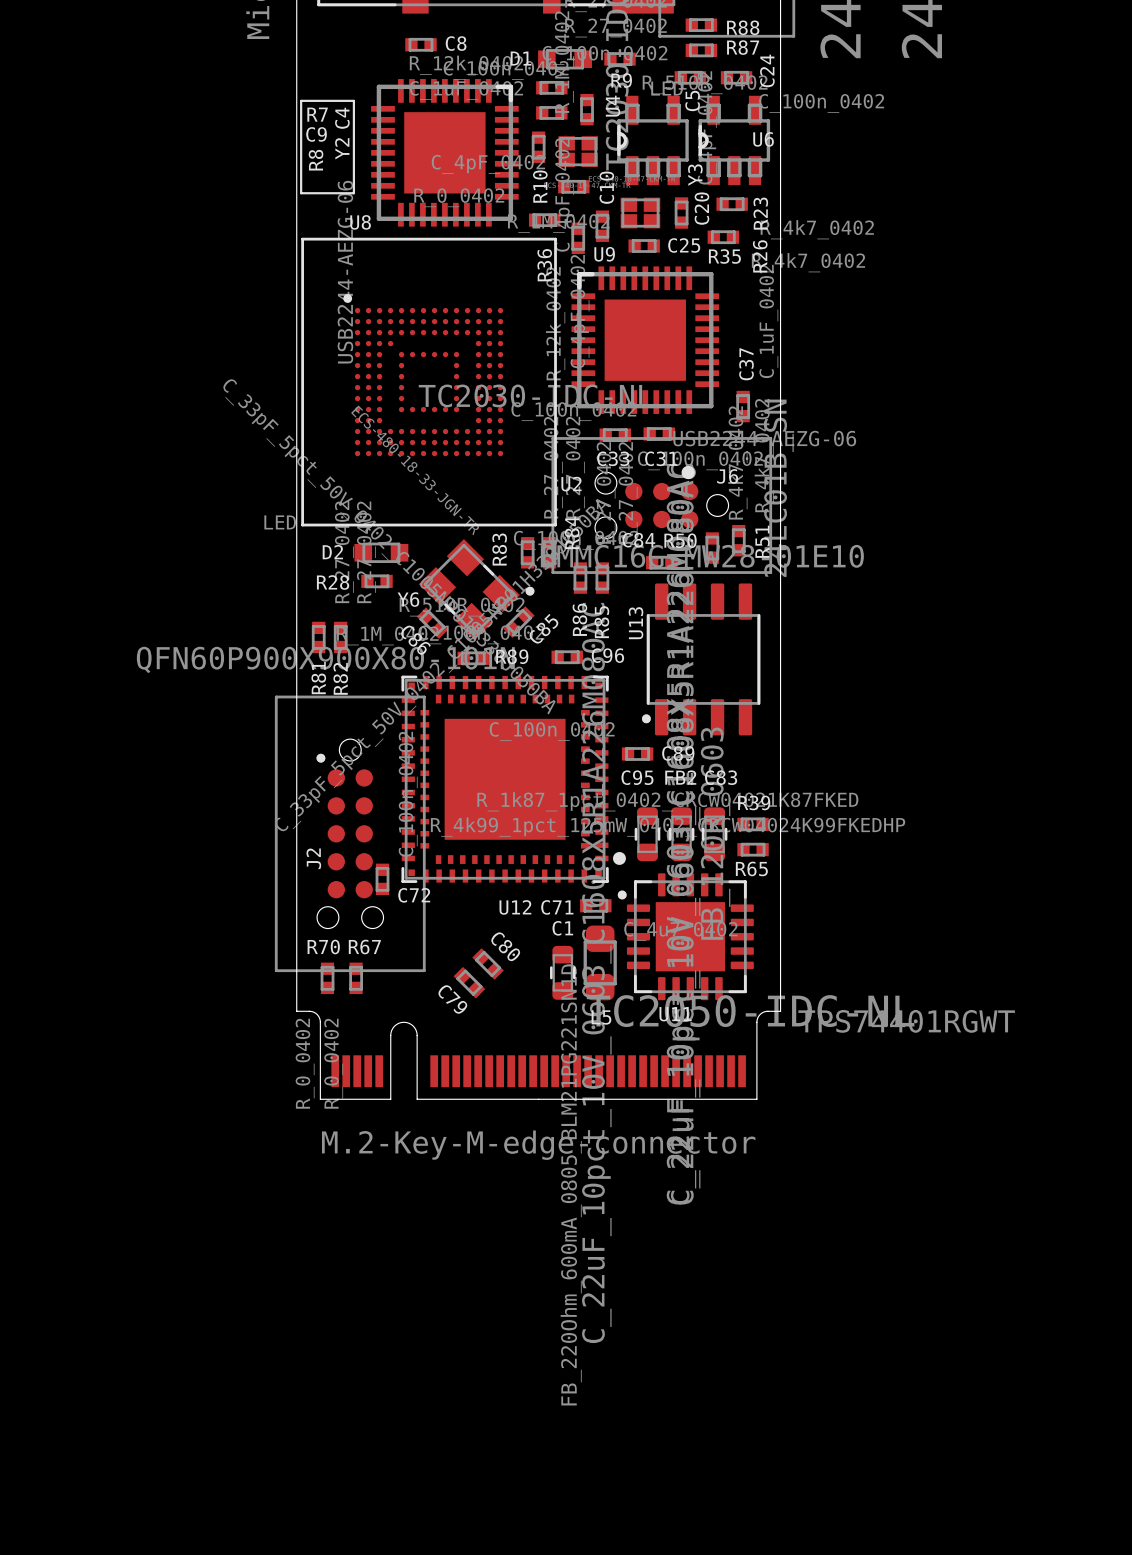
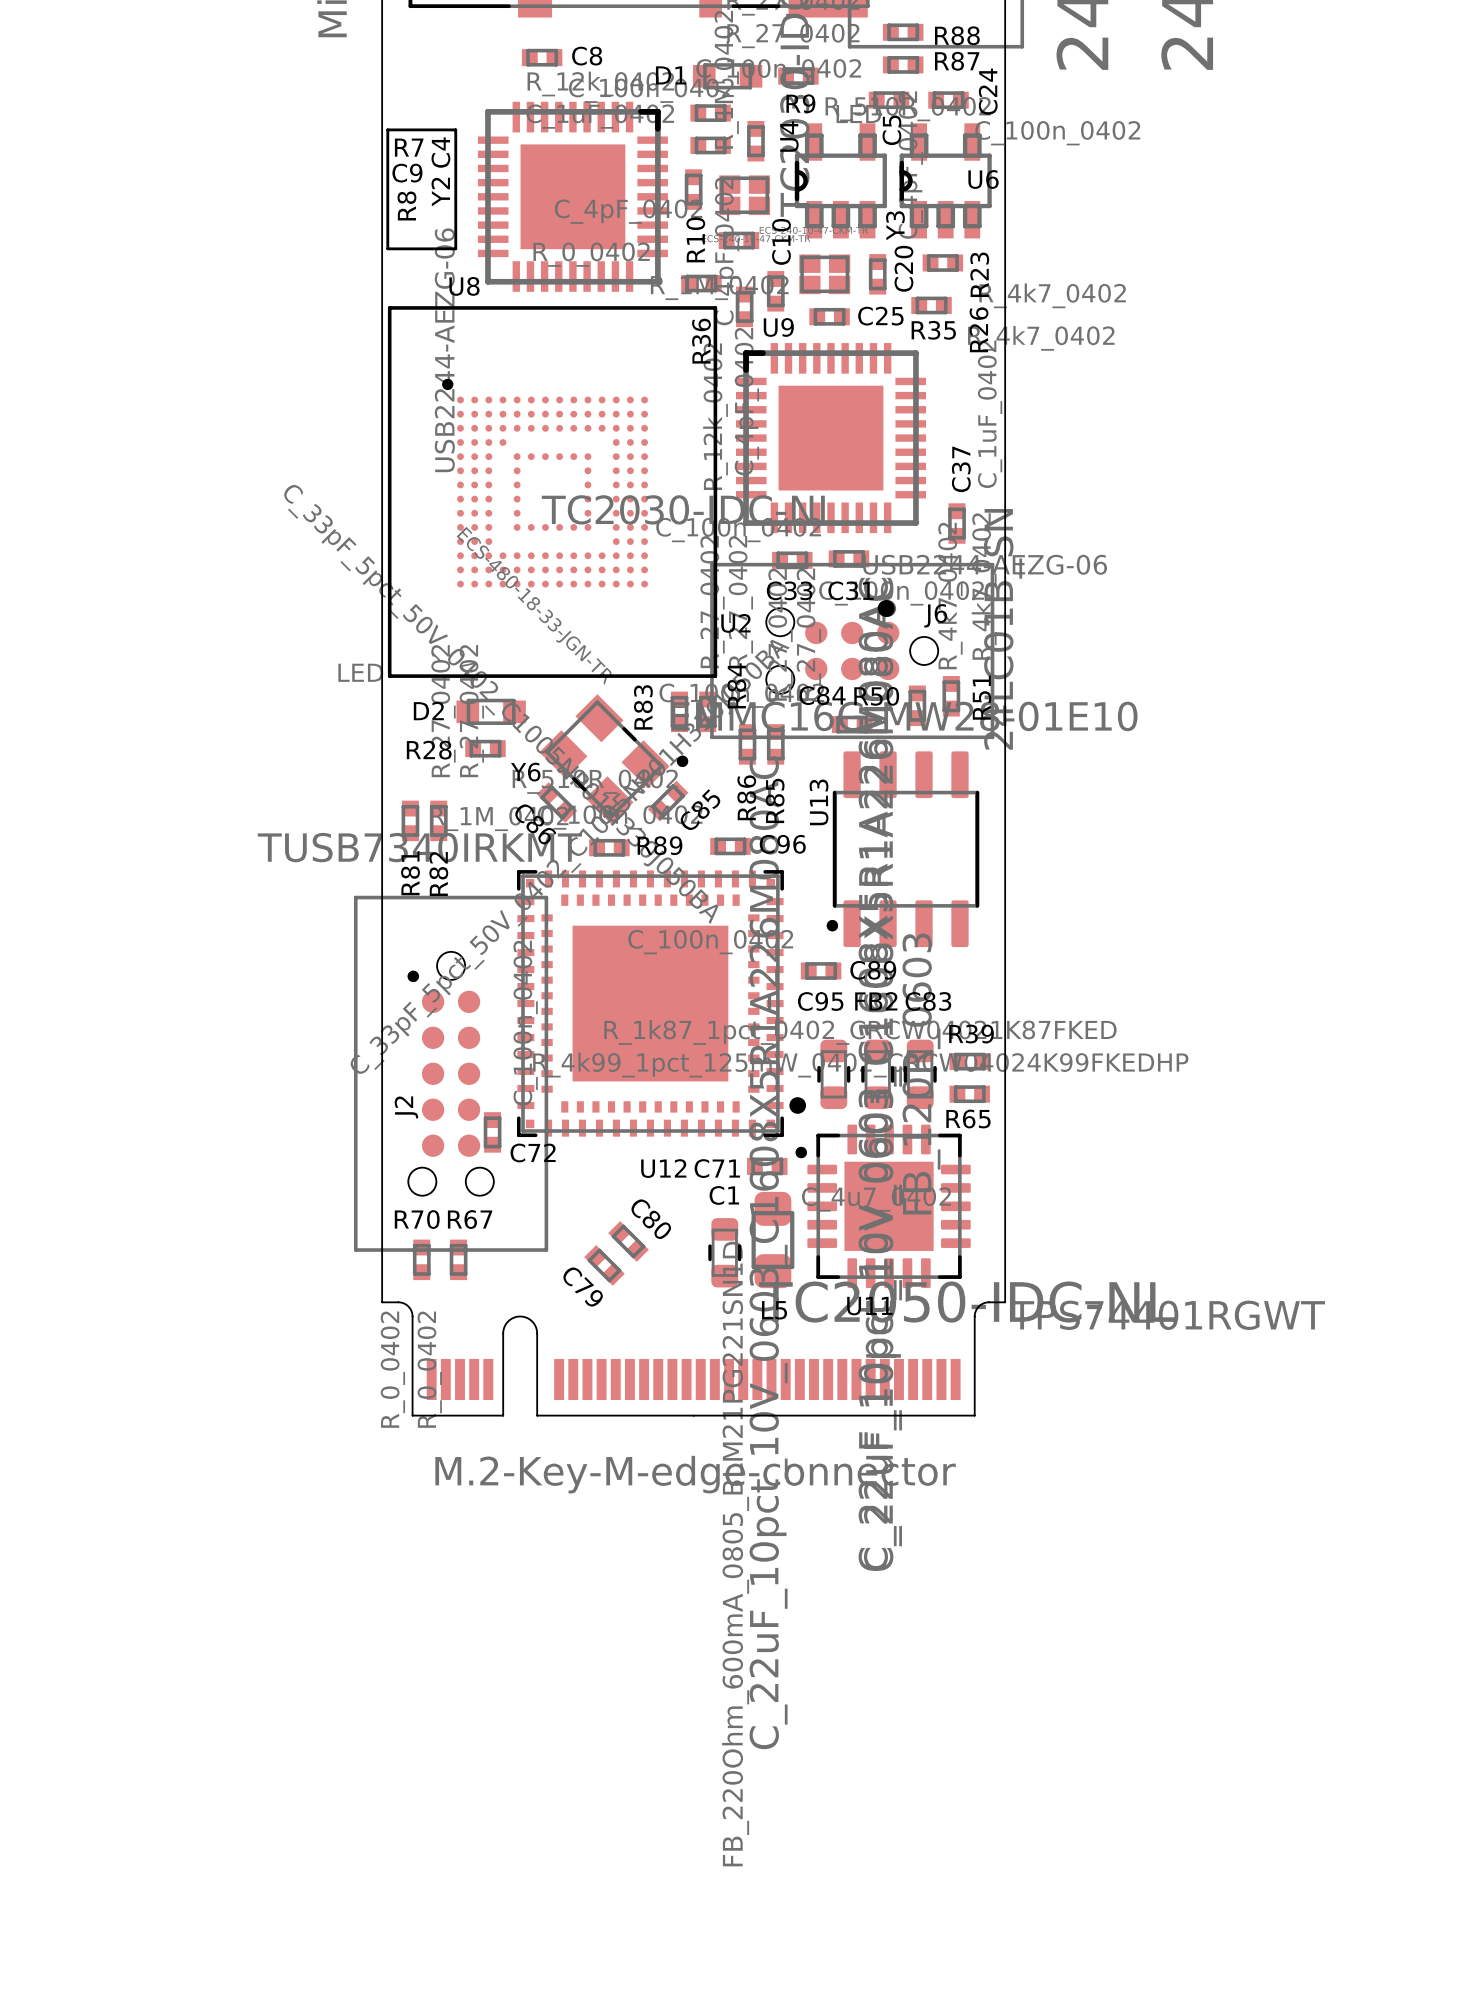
U12 value: QFN60P900X900X80-101N (325, 659) -> TUSB7340IRKMT (419, 847)

